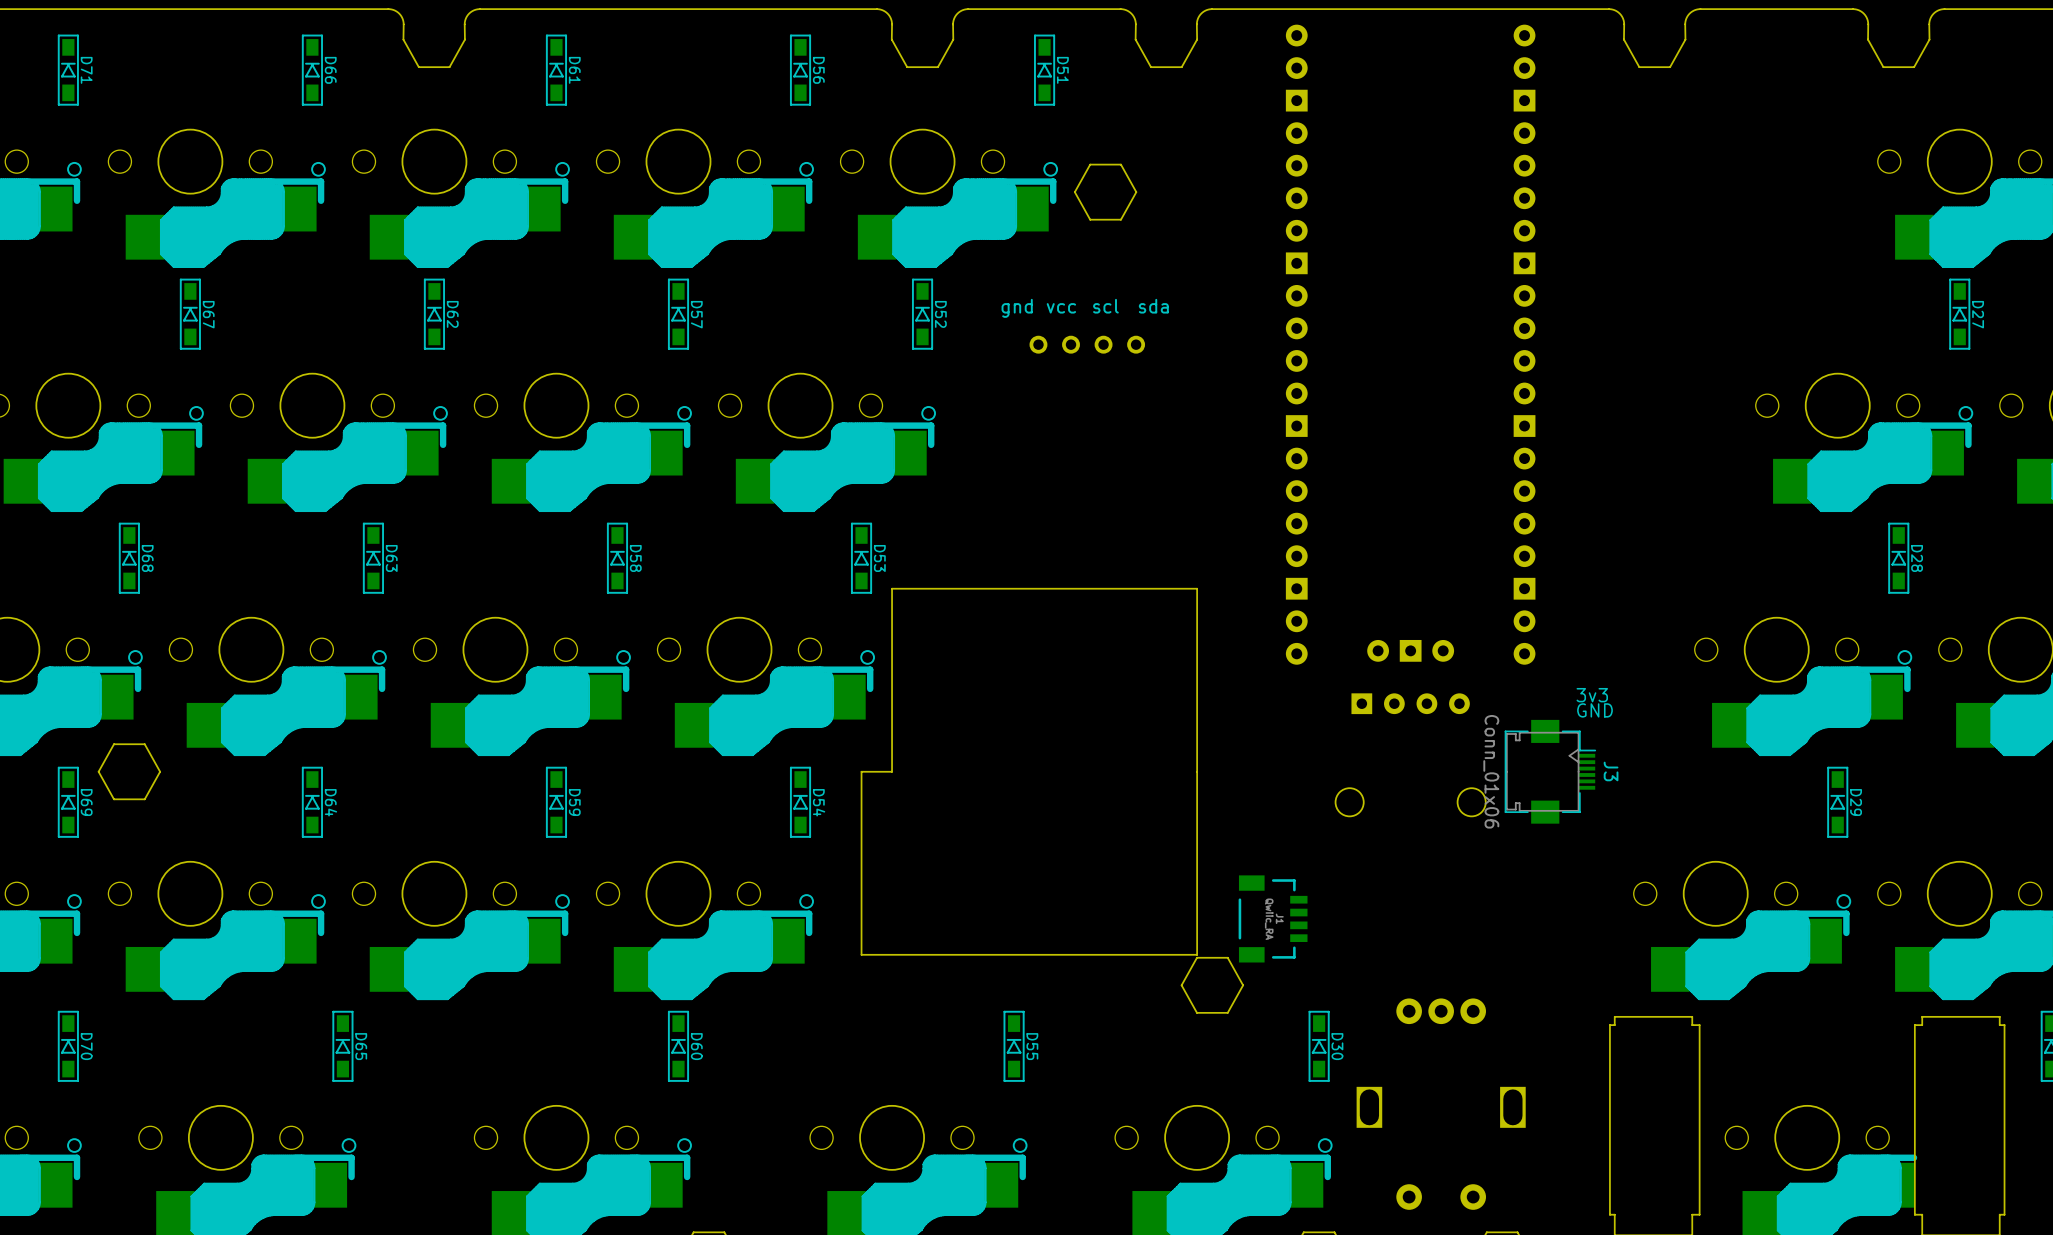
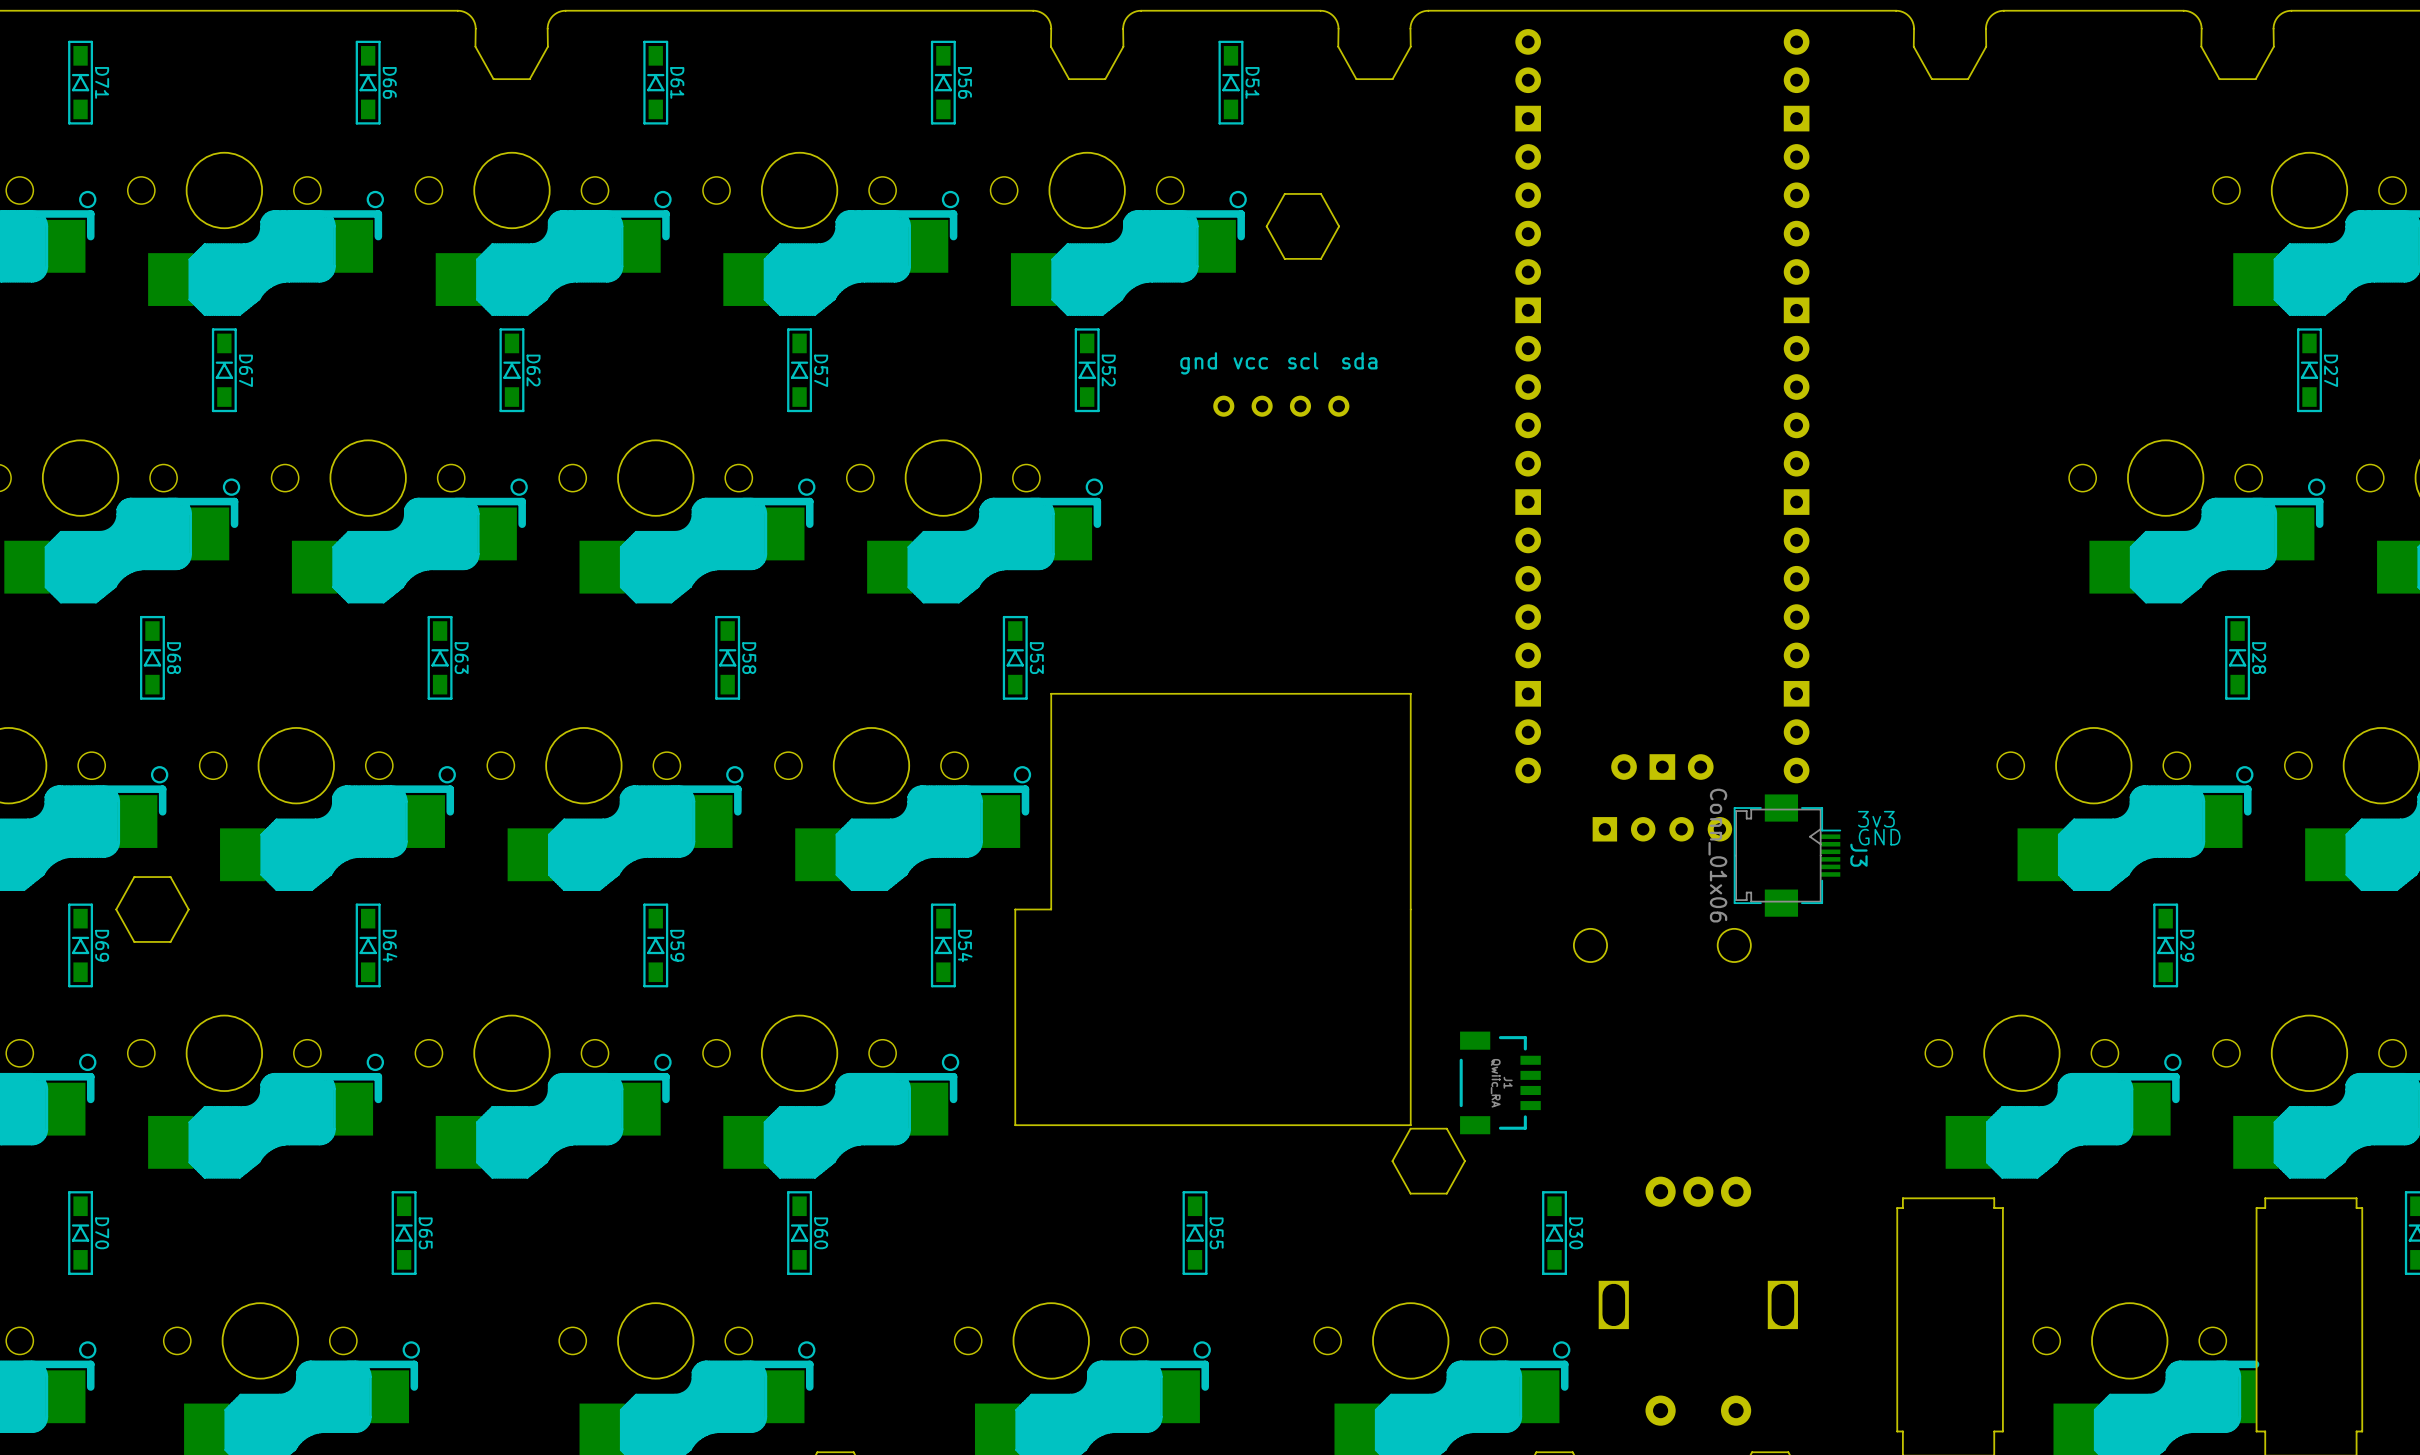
J3 position: (1550, 771) -> (1787, 855)

